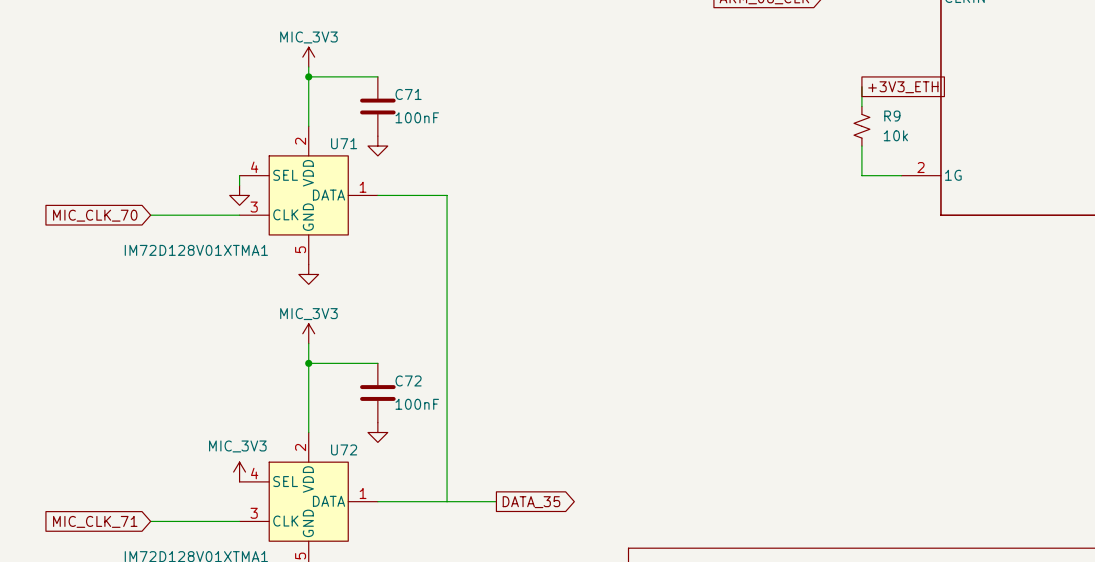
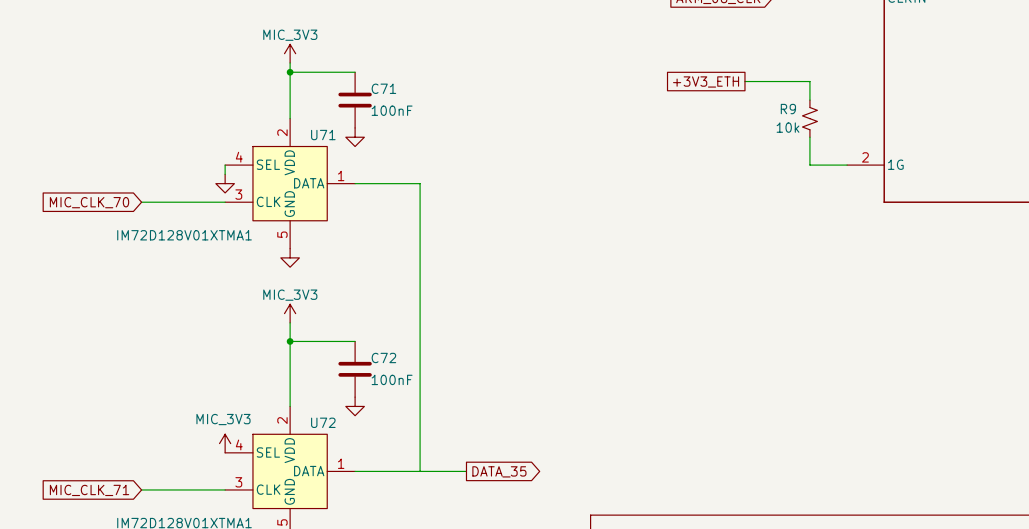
wire: none -> (744, 81) (809, 81)
global label rotation: 0° (903, 87) -> 180° (706, 81)
global label position: +3V3_ETH (903, 87) -> +3V3_ETH (706, 81)
R9 name position: R9 (892, 116) -> R9 (788, 109)
R9 value position: 10k (895, 135) -> 10k (788, 127)

